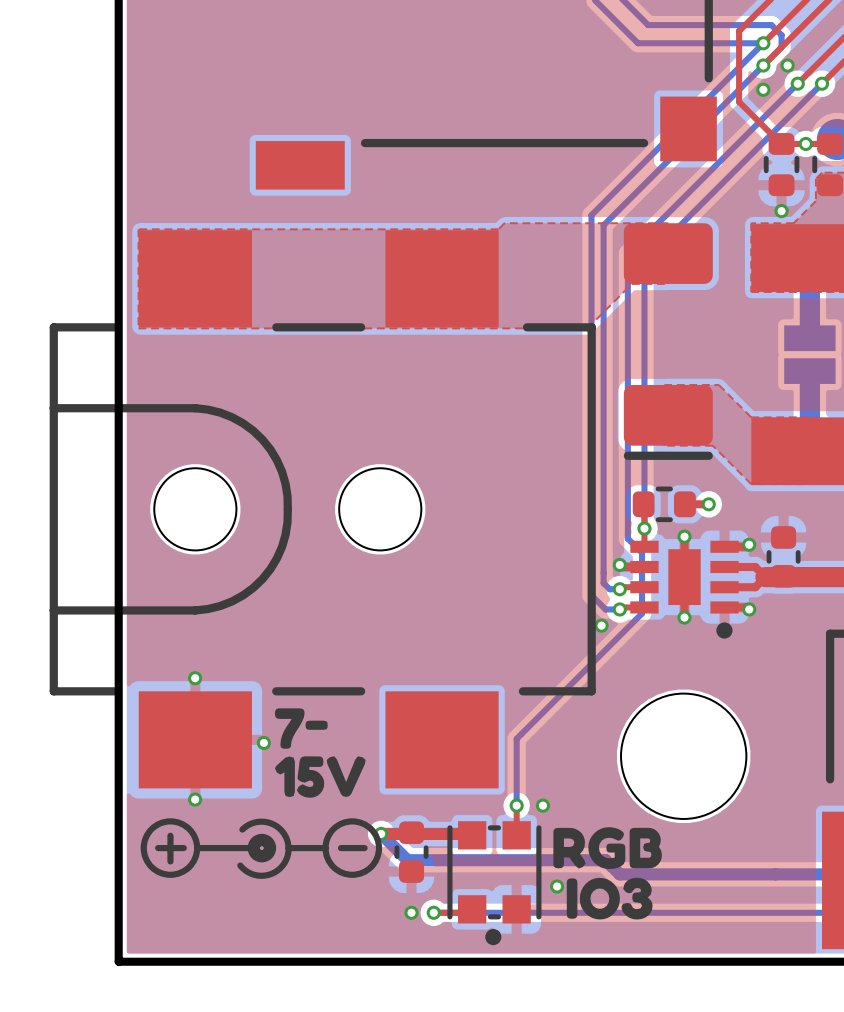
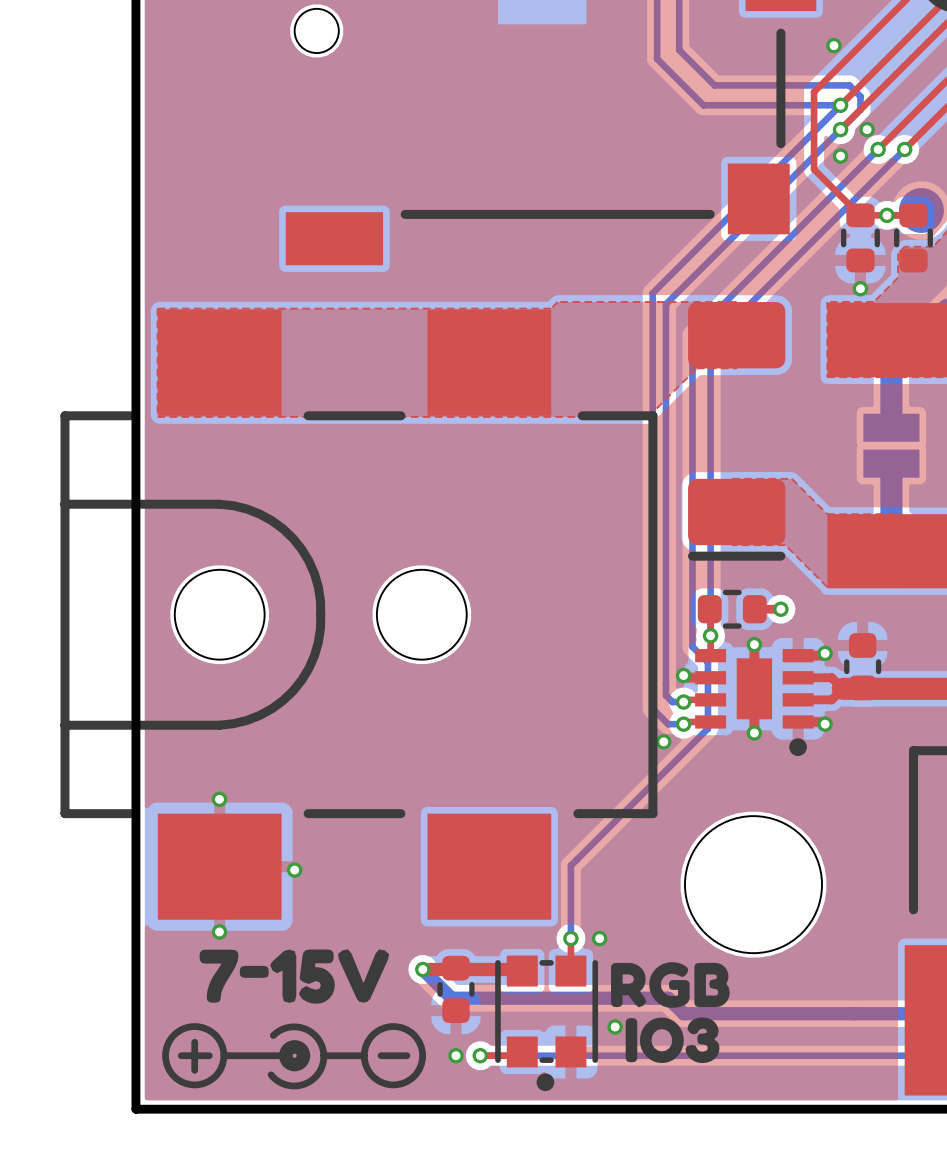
drawing: [274, 708, 366, 798] -> none
drawing: none -> [199, 949, 390, 1004]
drawing position: (261, 848) -> (294, 1056)

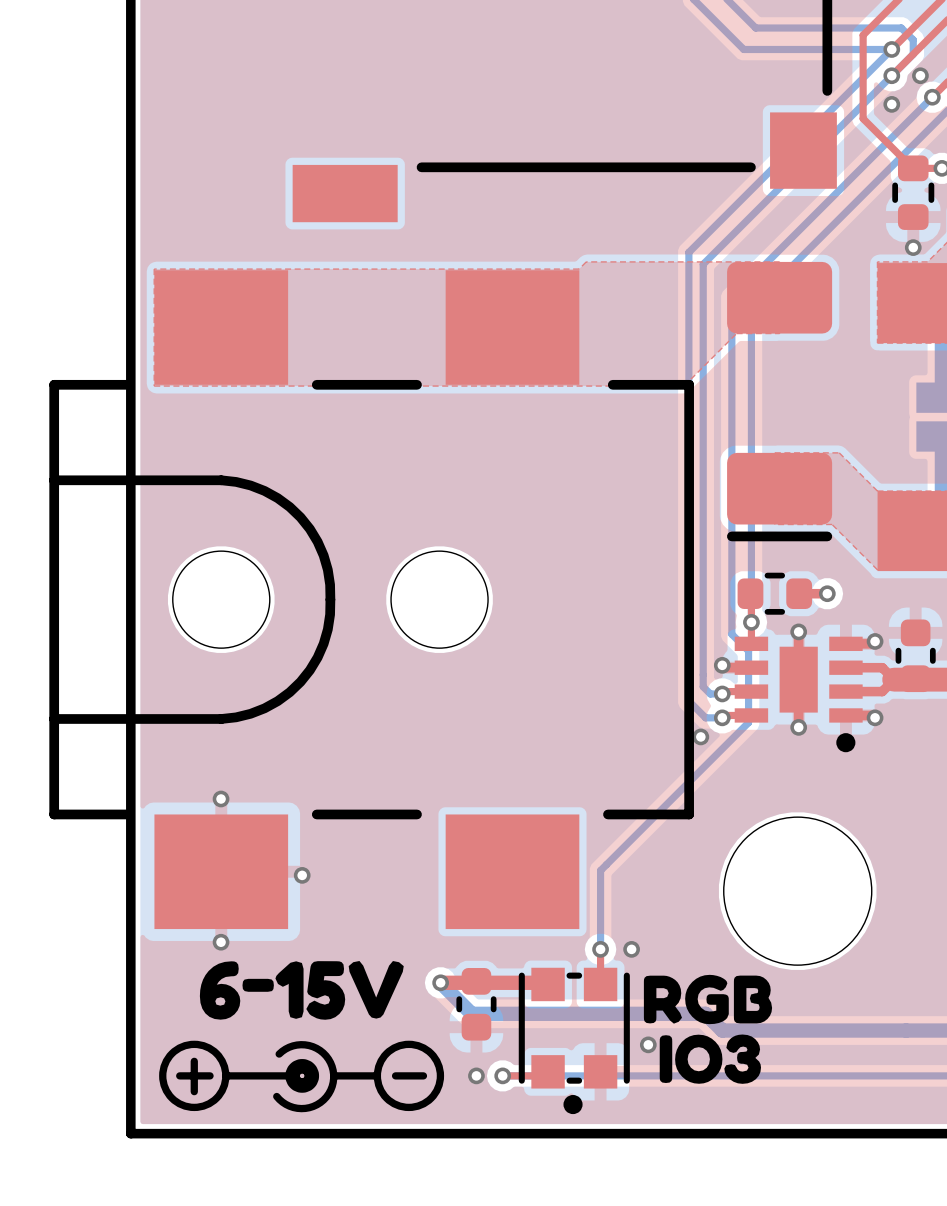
drawing shape: [199, 949, 390, 1004] -> [199, 960, 404, 1020]

